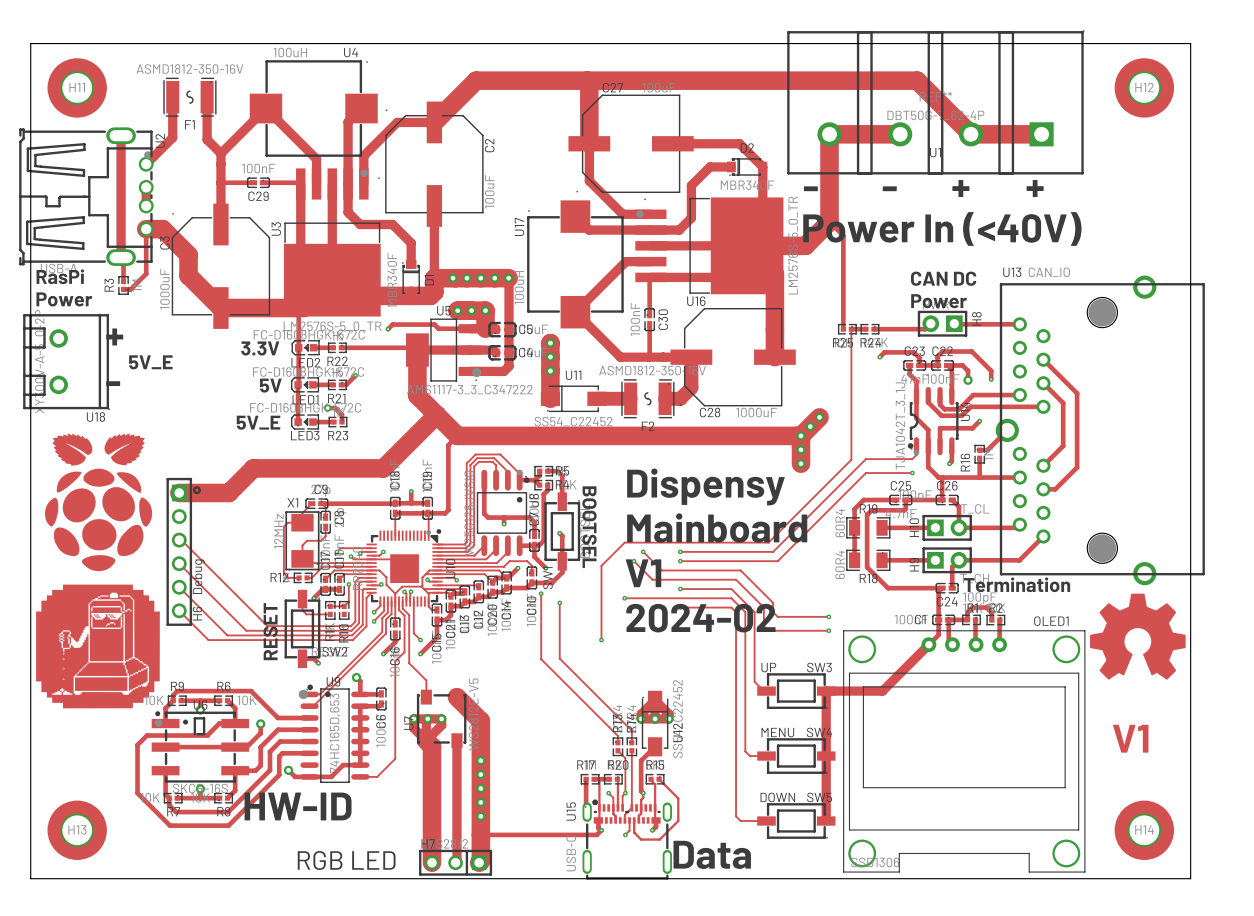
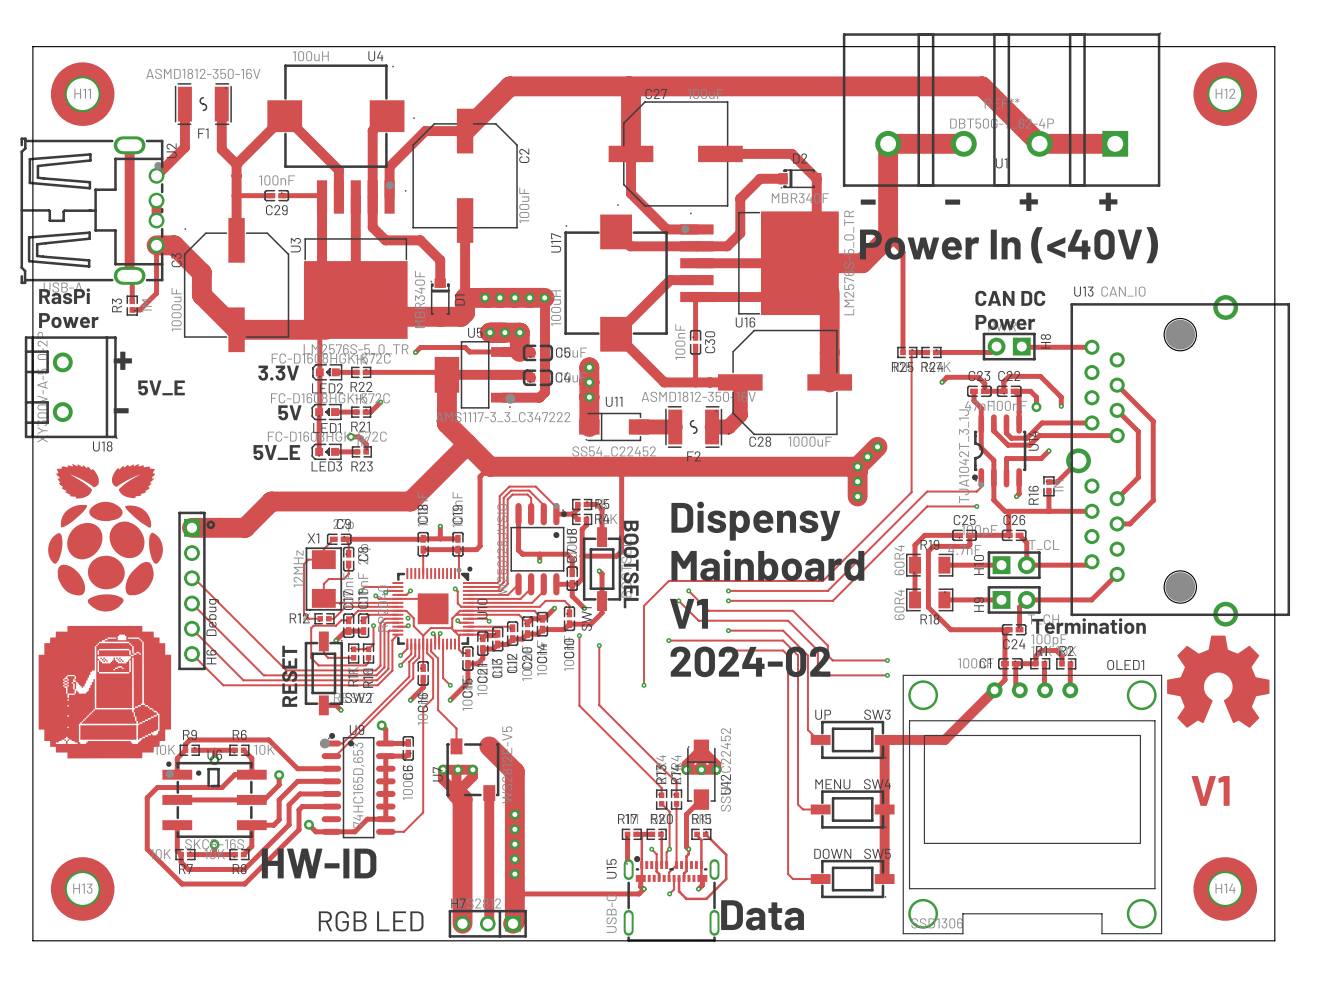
track: none -> (621, 466) (621, 551) (616, 556) (582, 556)
track: none -> (455, 588) (457, 591) (457, 603) (461, 606) (468, 606)
via: none -> (455, 588)
via: none -> (408, 618)
track: none -> (348, 620) (341, 620) (336, 625) (313, 625) (311, 628) (311, 657) (318, 665) (365, 665) (368, 662) (368, 657)

